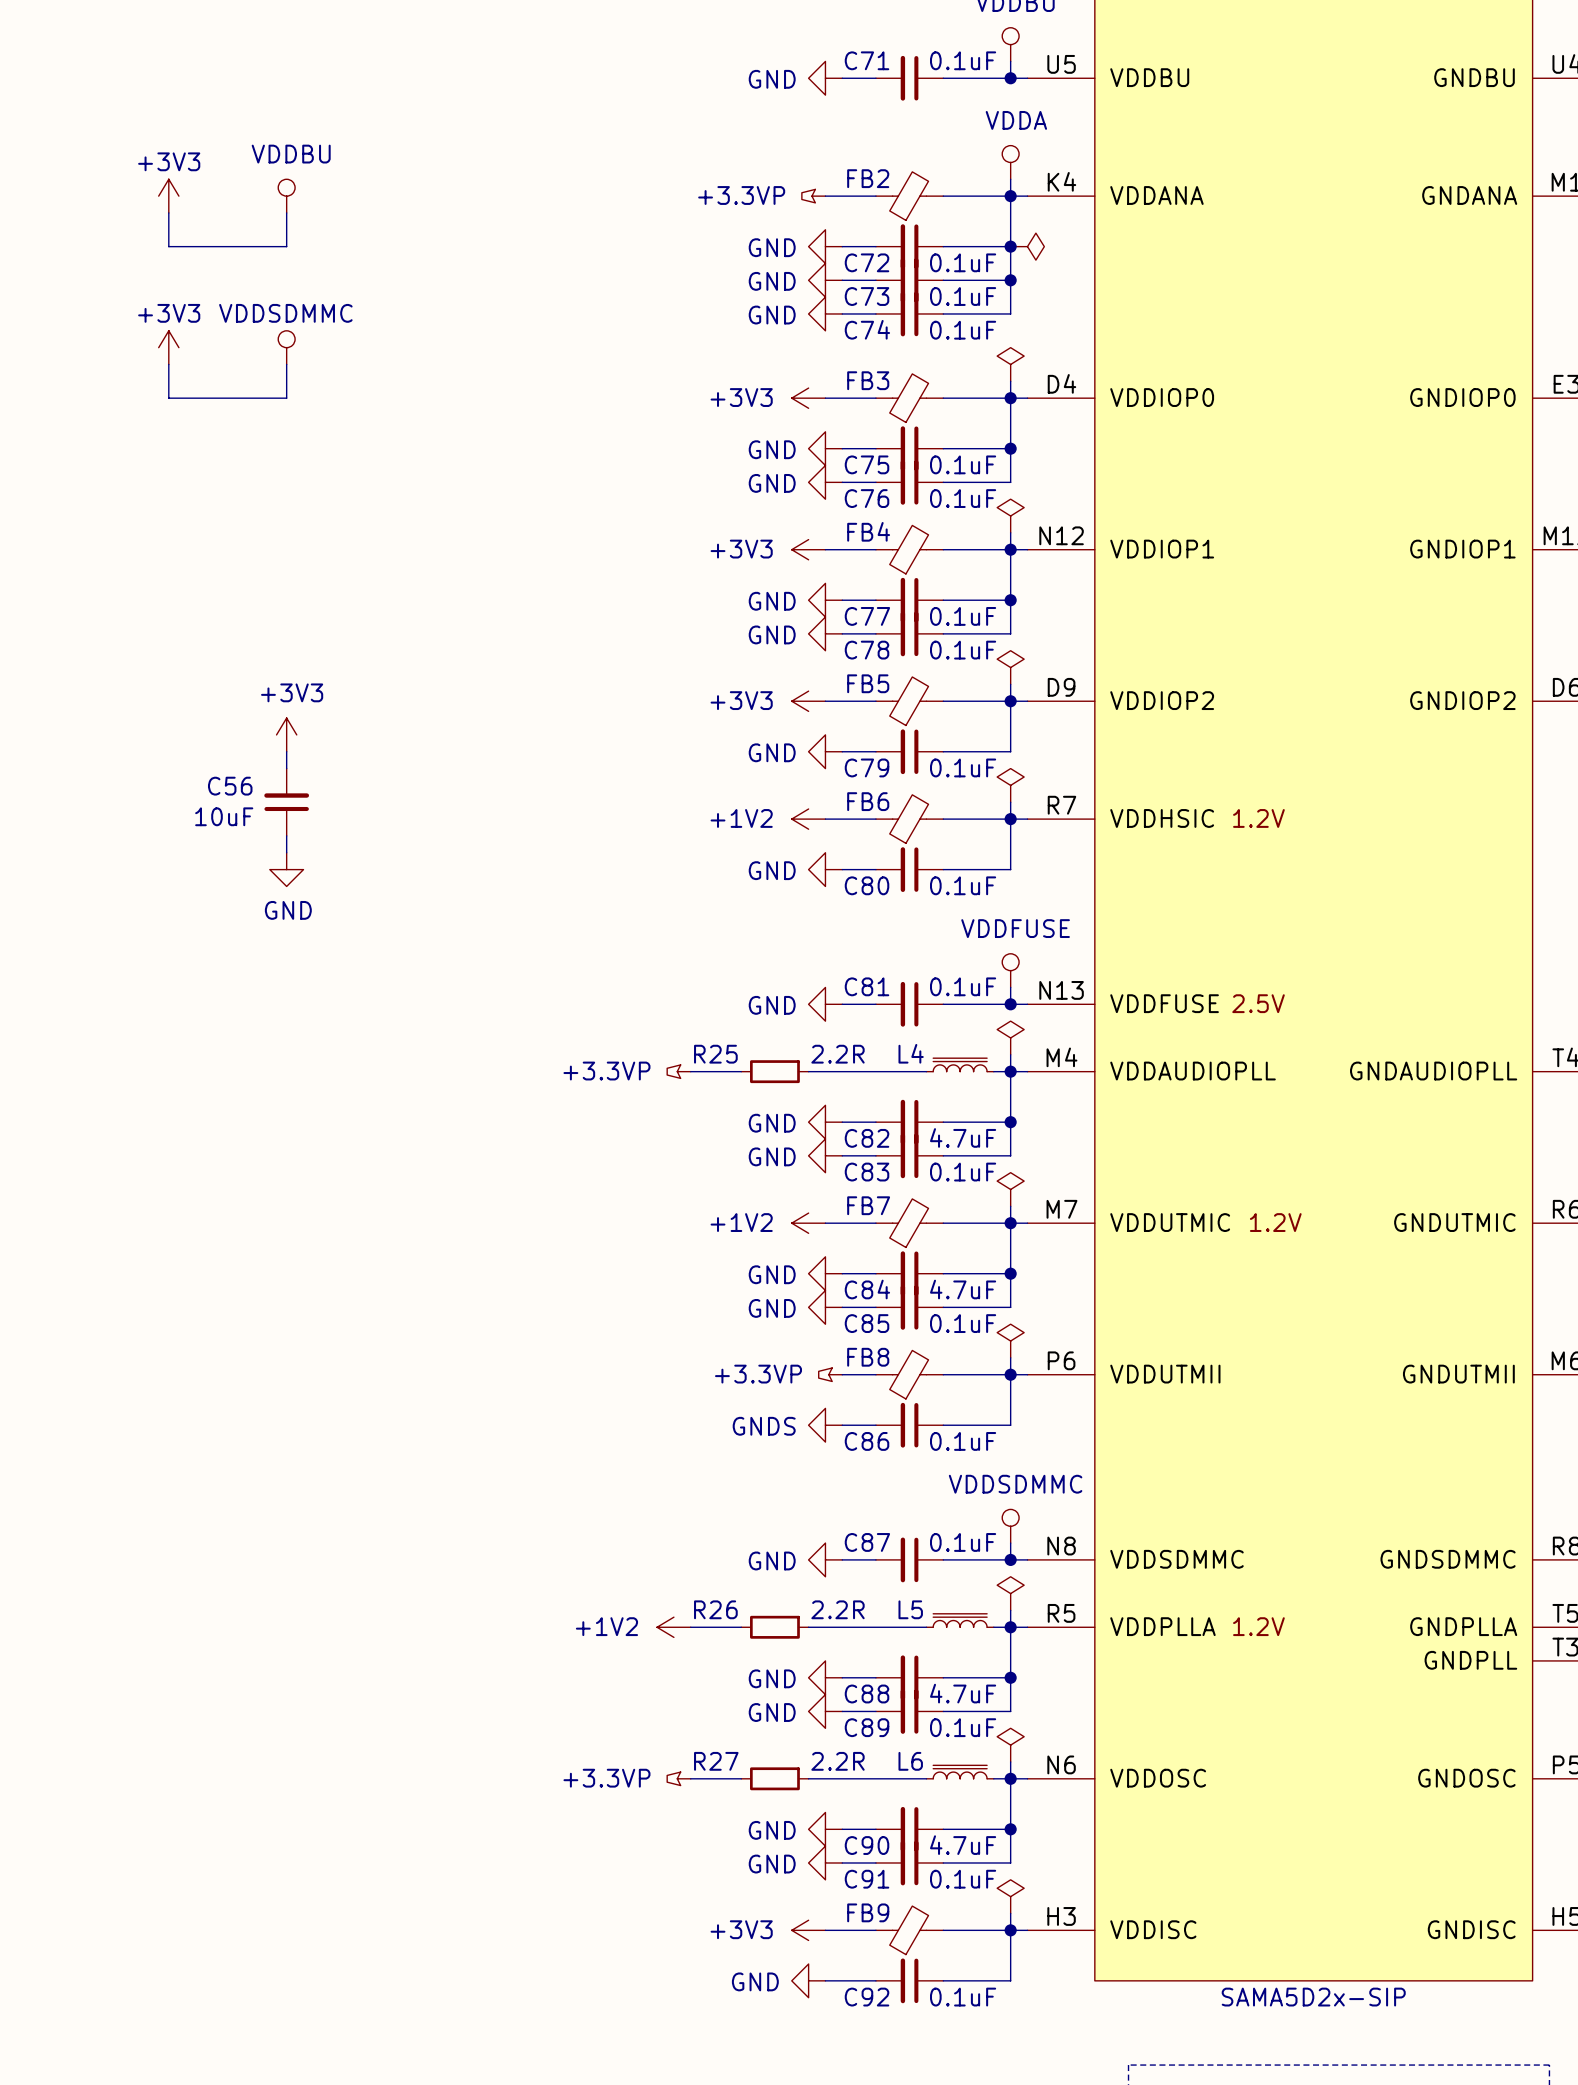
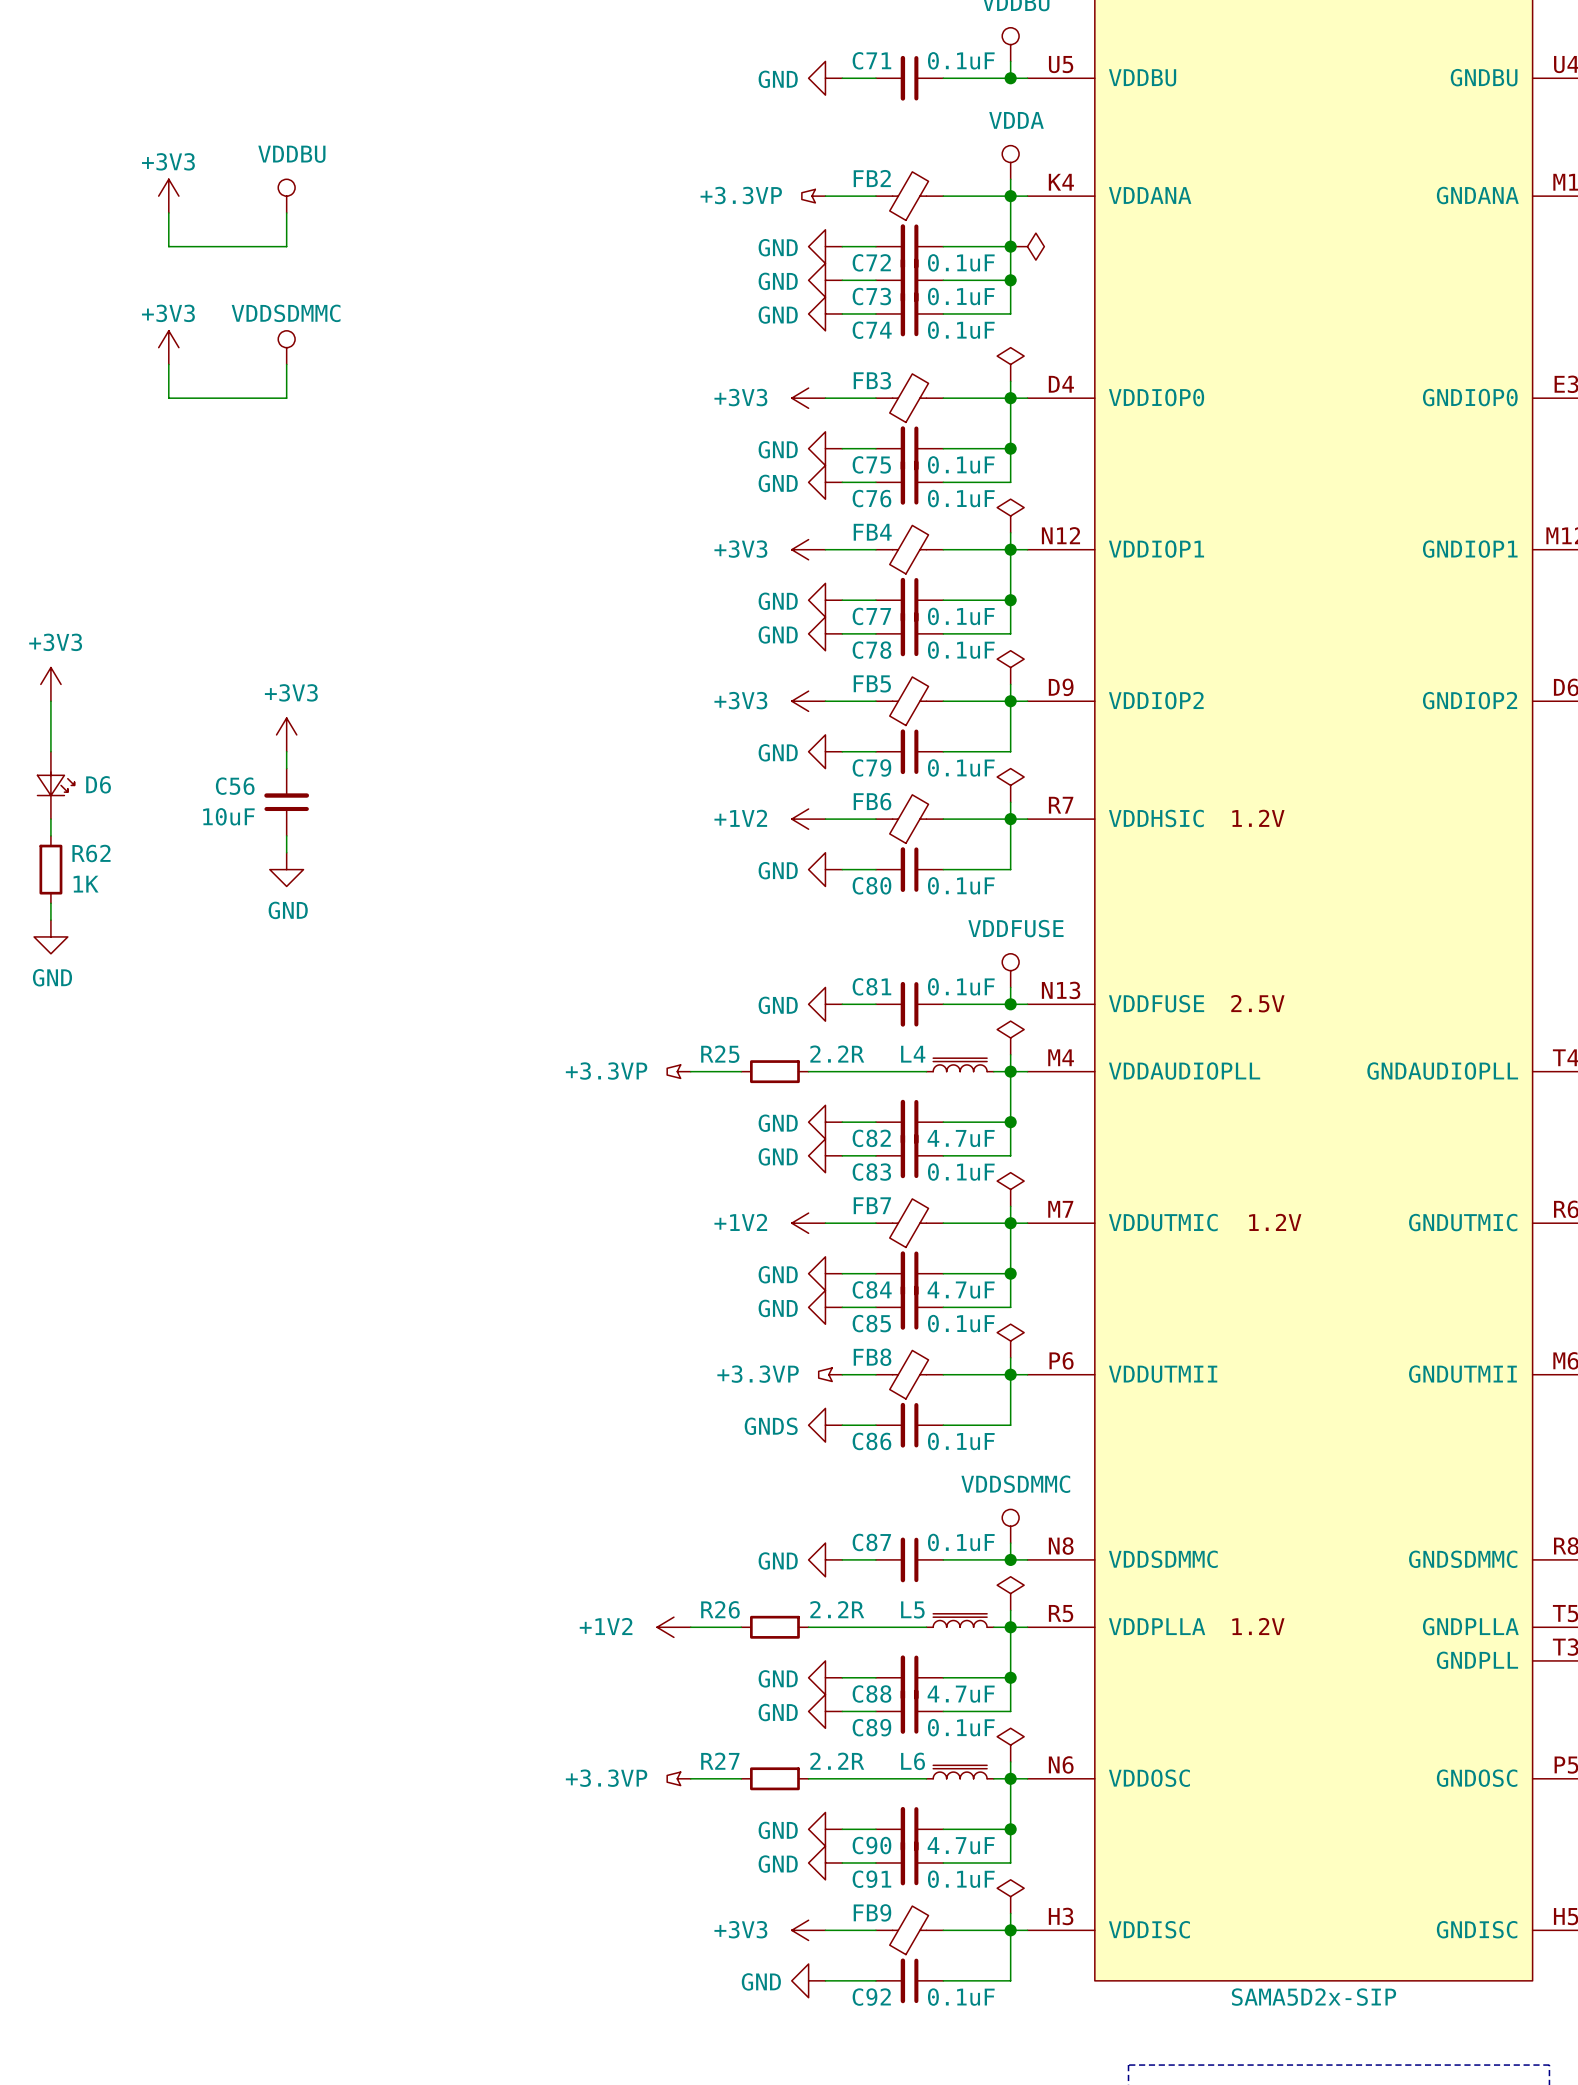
power symbol: none -> +3V3 (50, 684)
wire: none -> (50, 701) (50, 751)
D6: none -> (55, 785)
wire: none -> (50, 819) (50, 835)
R62: none -> 1K (50, 869)
wire: none -> (50, 903) (50, 920)
power symbol: none -> GND (50, 936)

